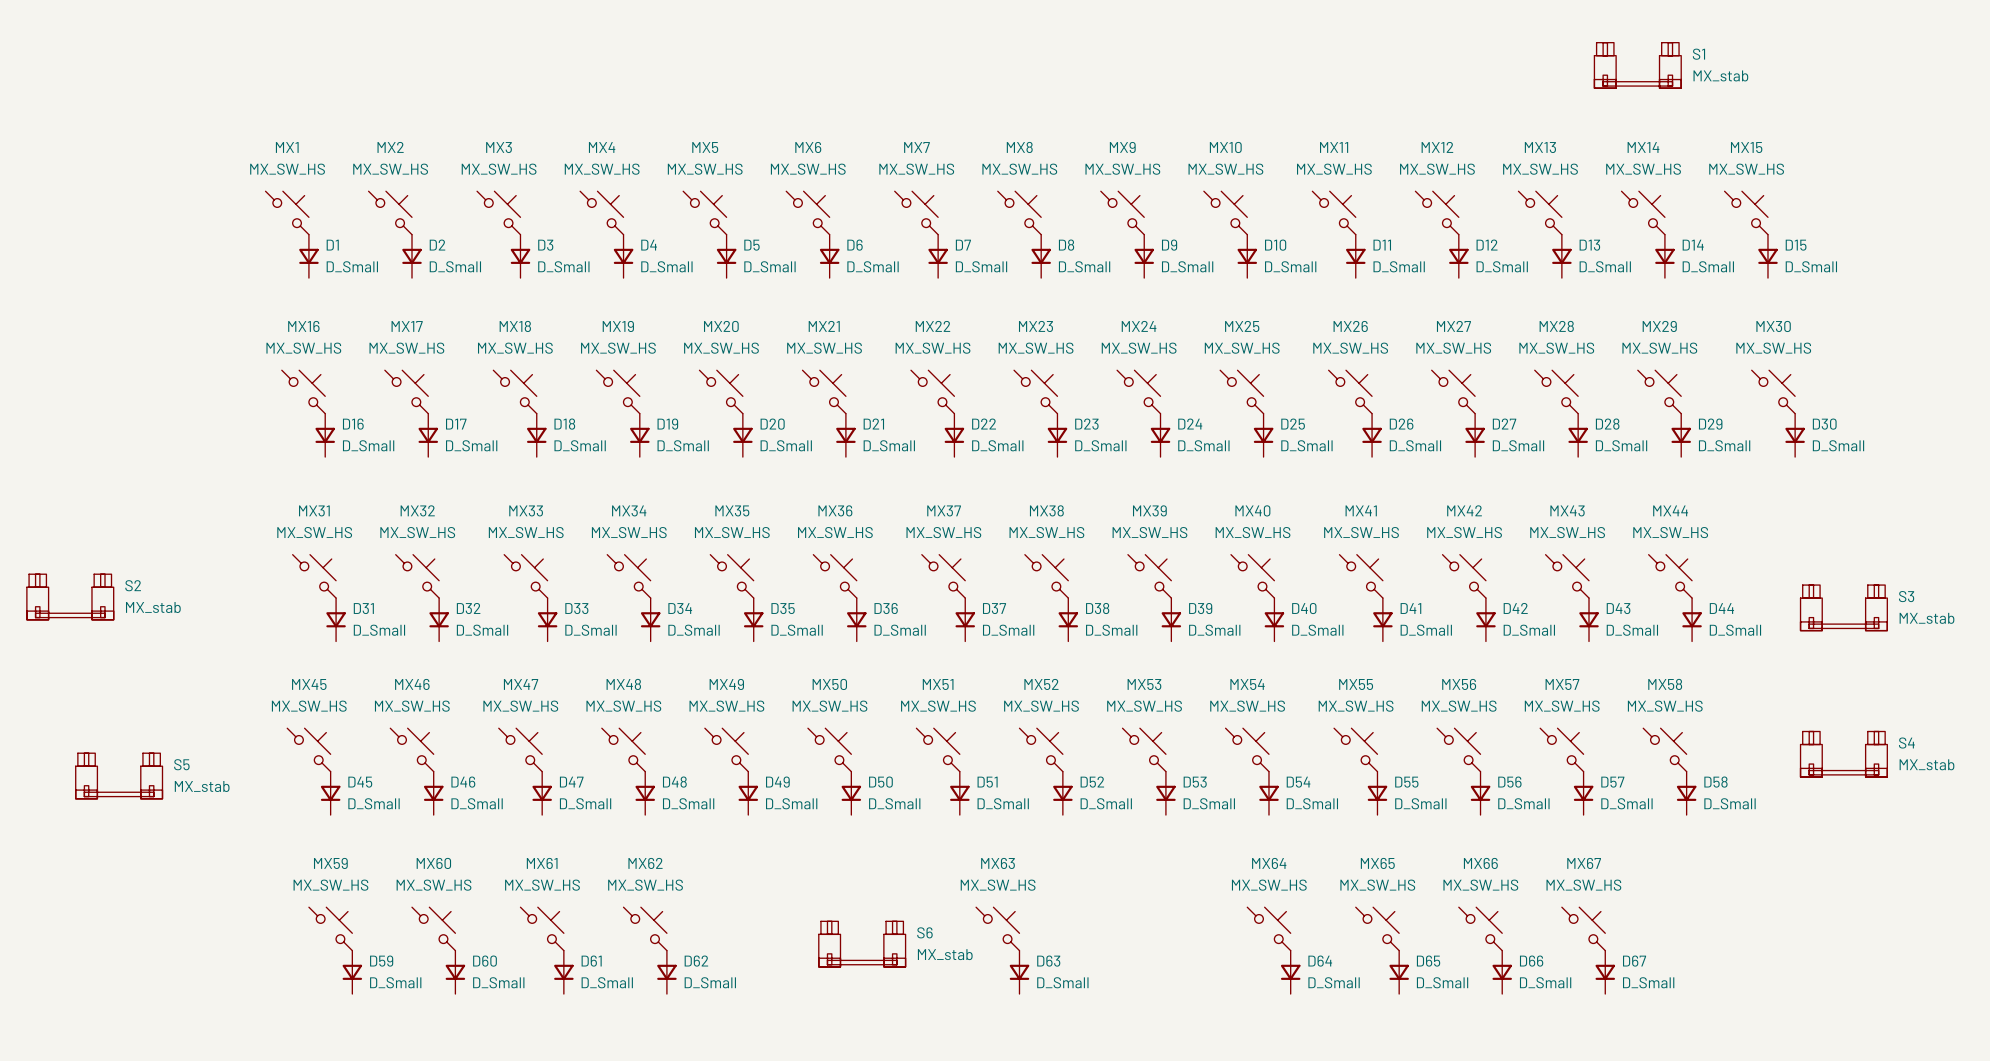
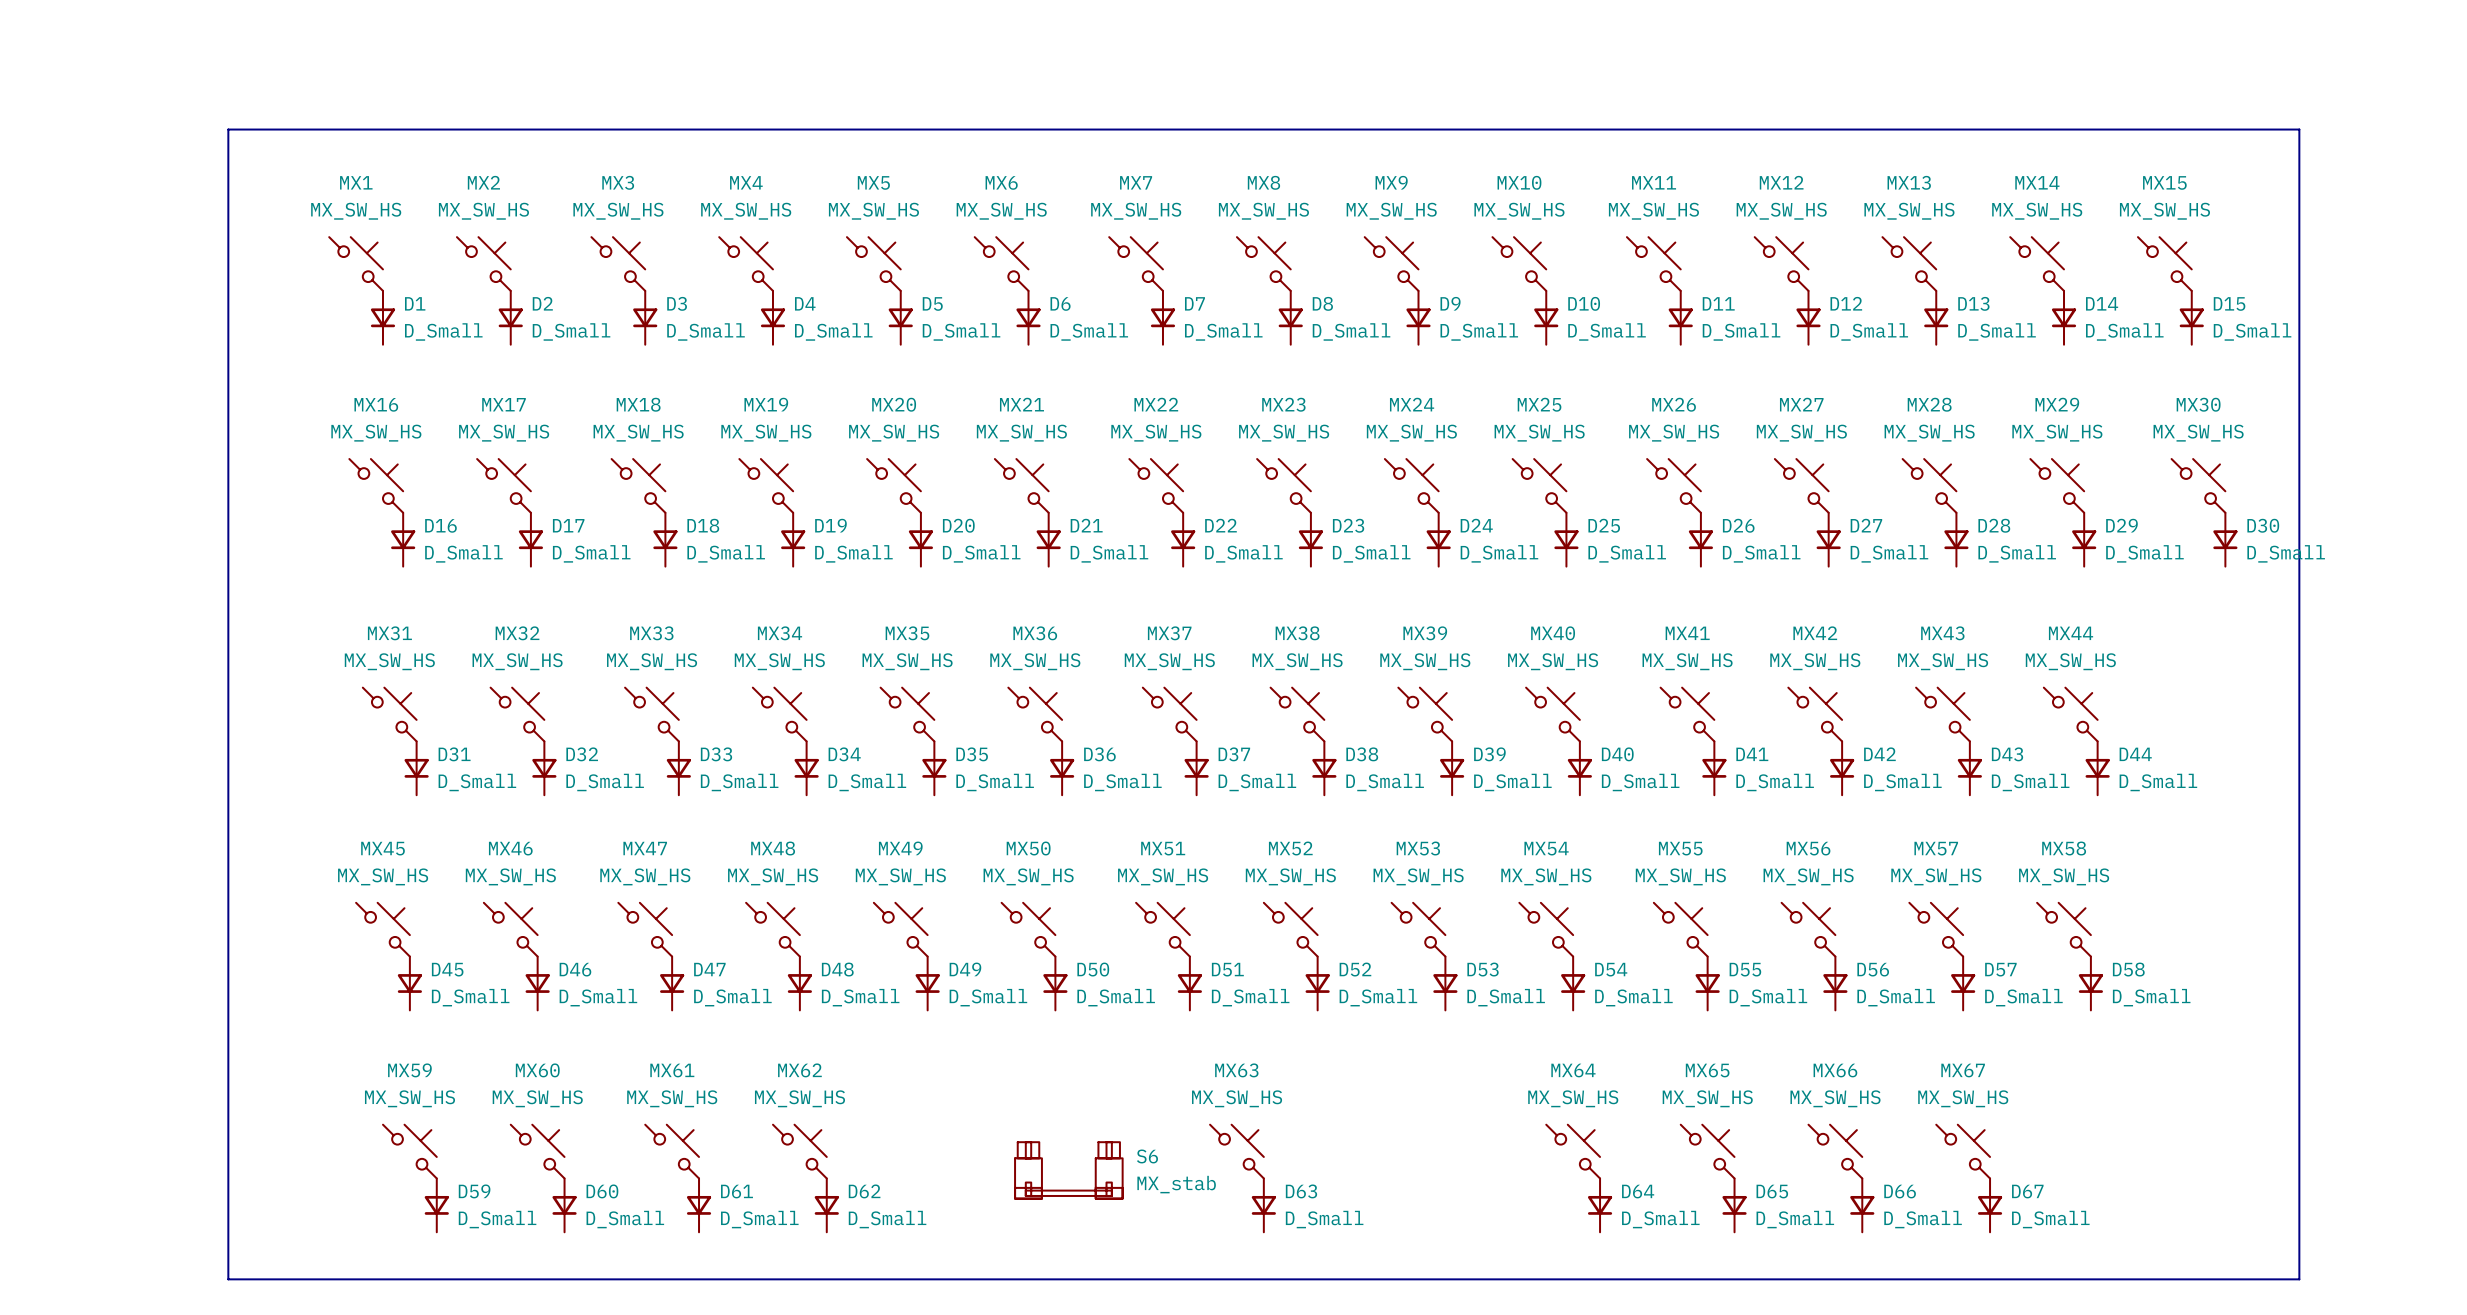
S1: MX_stab (1637, 65) -> none
line: none -> (228, 129) (2299, 129) (2299, 1279) (228, 1279) (228, 129)
S2: MX_stab (70, 596) -> none
S3: MX_stab (1843, 607) -> none
S4: MX_stab (1843, 754) -> none
S5: MX_stab (119, 775) -> none

